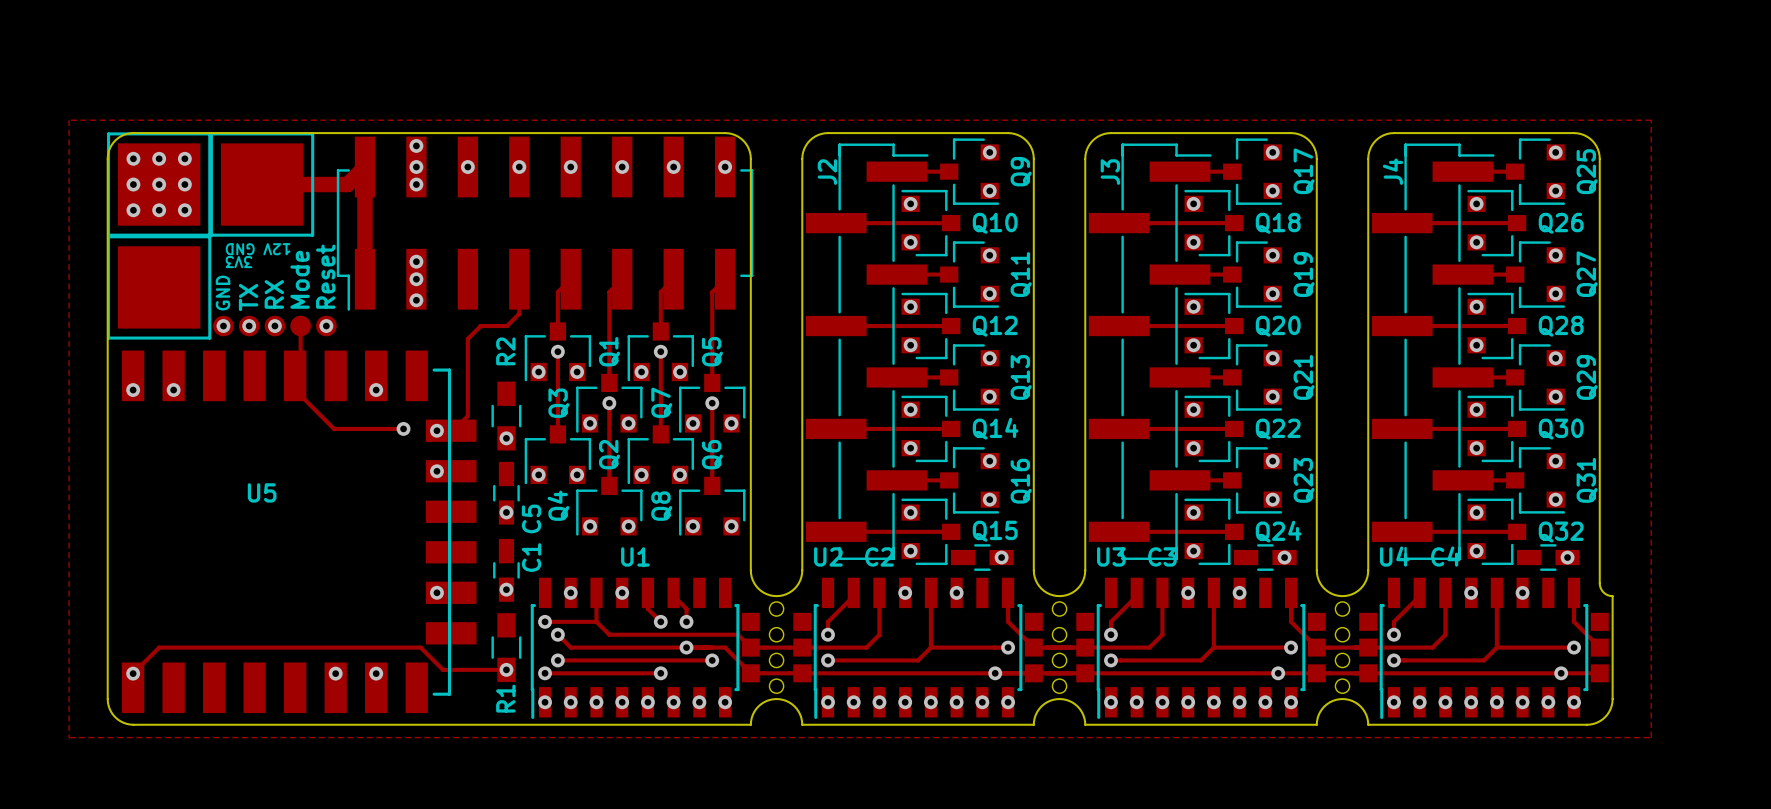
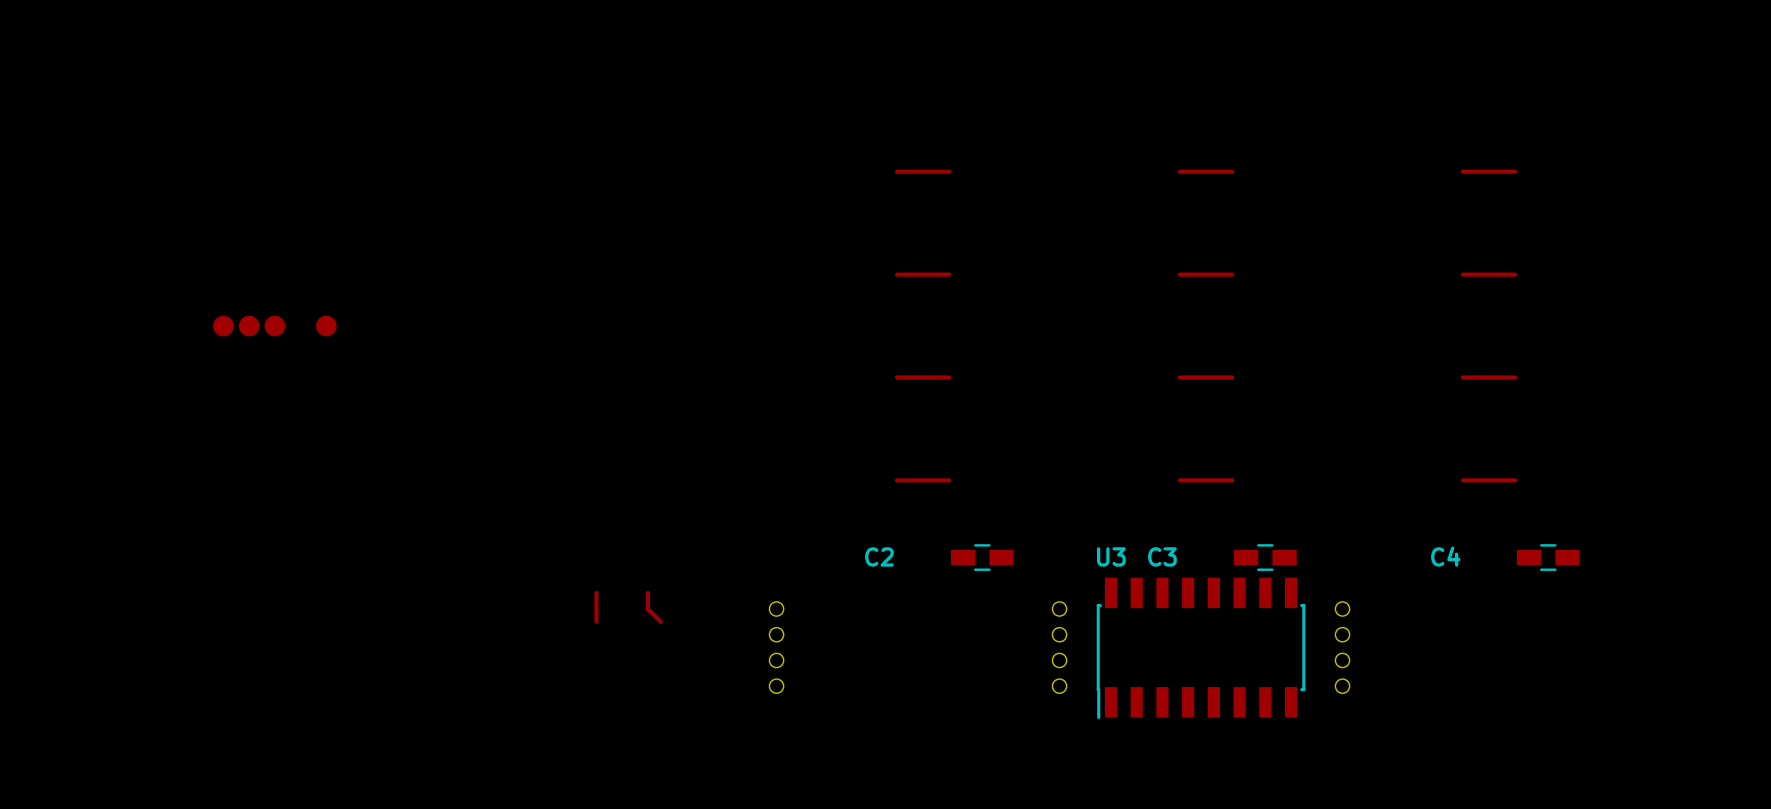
zone outline: (69, 120) (1651, 120) (1651, 737) (69, 737) (69, 120) -> none
board edge: (133, 133) (725, 133) (740, 138) (747, 145) (750, 158) (751, 573) (758, 588) (766, 594) (776, 596) (786, 594) (794, 588) (802, 573) (802, 158) (805, 145) (815, 136) (828, 133) (1008, 133) (1020, 136) (1030, 145) (1033, 158) (1033, 570) (1035, 580) (1041, 588) (1049, 594) (1059, 596) (1069, 594) (1077, 588) (1083, 580) (1085, 570) (1085, 158) (1088, 145) (1098, 136) (1110, 133) (1291, 133) (1306, 138) (1313, 145) (1316, 158) (1317, 573) (1324, 588) (1332, 594) (1342, 596) (1352, 594) (1360, 588) (1366, 580) (1368, 570) (1368, 158) (1371, 145) (1381, 136) (1393, 133) (1574, 133) (1583, 135) (1596, 145) (1599, 158) (1599, 583) (1603, 592) (1612, 596) (1612, 699) (1610, 708) (1599, 721) (1586, 724) (1368, 724) (1366, 714) (1360, 706) (1352, 700) (1342, 699) (1332, 700) (1324, 706) (1318, 714) (1316, 724) (1085, 724) (1083, 714) (1077, 706) (1069, 700) (1059, 699) (1049, 700) (1041, 706) (1035, 714) (1033, 724) (802, 724) (800, 714) (794, 706) (786, 700) (776, 699) (766, 700) (758, 706) (752, 714) (750, 724) (133, 724) (123, 722) (111, 711) (107, 699) (107, 158) (109, 148) (115, 140) (123, 135) (133, 133) -> none
via: (416, 145) -> none
via: (989, 152) -> none
via: (1272, 152) -> none
via: (1555, 152) -> none
via: (133, 158) -> none
via: (159, 158) -> none
via: (184, 158) -> none
via: (416, 167) -> none
via: (467, 167) -> none
via: (519, 167) -> none
via: (570, 167) -> none
via: (622, 167) -> none
via: (673, 167) -> none
via: (725, 167) -> none
Q9: (969, 171) -> none
Q17: (1252, 171) -> none
Q25: (1535, 171) -> none
via: (133, 184) -> none
part: (159, 184) -> none
via: (159, 184) -> none
via: (184, 184) -> none
track: (262, 184) (347, 184) (364, 167) (364, 279) -> none
part: (262, 184) -> none
via: (416, 184) -> none
via: (989, 190) -> none
via: (1272, 190) -> none
via: (1555, 190) -> none
via: (910, 203) -> none
via: (1193, 203) -> none
via: (1476, 203) -> none
via: (133, 210) -> none
via: (159, 210) -> none
via: (184, 210) -> none
part: (545, 223) -> none
track: (836, 223) (951, 223) -> none
Q10: (930, 223) -> none
track: (1119, 223) (1234, 223) -> none
Q18: (1213, 223) -> none
track: (1402, 223) (1517, 223) -> none
Q26: (1496, 223) -> none
via: (910, 242) -> none
via: (1193, 242) -> none
via: (1476, 242) -> none
text: GND (240, 249) -> none
text: 12V (276, 249) -> none
via: (989, 255) -> none
via: (1272, 255) -> none
via: (1555, 255) -> none
via: (416, 261) -> none
text: 3V3 (239, 262) -> none
Q11: (969, 274) -> none
Q19: (1252, 274) -> none
Q27: (1535, 274) -> none
text: Reset (325, 276) -> none
text: Mode (300, 279) -> none
via: (416, 279) -> none
track: (519, 279) (519, 313) (507, 326) (480, 326) (467, 338) (467, 416) (453, 430) (436, 430) -> none
track: (570, 279) (557, 292) (557, 331) -> none
track: (622, 279) (609, 292) (609, 382) -> none
track: (673, 279) (660, 292) (660, 331) -> none
track: (725, 279) (712, 292) (712, 382) -> none
part: (159, 287) -> none
text: GND (223, 293) -> none
via: (989, 293) -> none
via: (1272, 293) -> none
via: (1555, 293) -> none
text: RX (274, 294) -> none
text: TX (248, 297) -> none
via: (416, 300) -> none
via: (910, 306) -> none
via: (1193, 306) -> none
via: (1476, 306) -> none
via: (223, 326) -> none
via: (249, 326) -> none
via: (274, 326) -> none
track: (300, 326) (300, 384) (295, 390) (334, 428) (403, 428) -> none
part: (300, 326) -> none
via: (326, 326) -> none
track: (836, 326) (951, 326) -> none
Q12: (930, 326) -> none
track: (1119, 326) (1234, 326) -> none
Q20: (1213, 326) -> none
track: (1402, 326) (1517, 326) -> none
Q28: (1496, 326) -> none
via: (910, 345) -> none
via: (1193, 345) -> none
via: (1476, 345) -> none
track: (557, 351) (557, 434) -> none
Q1: (557, 351) -> none
via: (557, 351) -> none
track: (660, 351) (660, 434) -> none
Q5: (660, 351) -> none
via: (660, 351) -> none
J2: (867, 351) -> none
J3: (1150, 351) -> none
J4: (1433, 351) -> none
via: (989, 358) -> none
via: (1272, 358) -> none
via: (1555, 358) -> none
via: (538, 372) -> none
via: (577, 372) -> none
via: (641, 372) -> none
via: (680, 372) -> none
Q13: (969, 377) -> none
Q21: (1252, 377) -> none
Q29: (1535, 377) -> none
via: (133, 390) -> none
via: (173, 390) -> none
via: (376, 390) -> none
via: (989, 396) -> none
via: (1272, 396) -> none
via: (1555, 396) -> none
track: (609, 403) (609, 485) -> none
Q3: (609, 403) -> none
via: (609, 403) -> none
track: (712, 403) (712, 485) -> none
Q7: (712, 403) -> none
via: (712, 403) -> none
via: (910, 409) -> none
via: (1193, 409) -> none
via: (1476, 409) -> none
R2: (506, 416) -> none
via: (590, 423) -> none
via: (628, 423) -> none
via: (693, 423) -> none
via: (731, 423) -> none
via: (403, 428) -> none
track: (836, 428) (951, 428) -> none
Q14: (930, 428) -> none
track: (1119, 428) (1234, 428) -> none
Q22: (1213, 428) -> none
track: (1402, 428) (1517, 428) -> none
Q30: (1496, 428) -> none
via: (436, 430) -> none
via: (506, 438) -> none
via: (910, 448) -> none
via: (1193, 448) -> none
via: (1476, 448) -> none
Q2: (557, 454) -> none
Q6: (660, 454) -> none
via: (989, 461) -> none
via: (1272, 461) -> none
via: (1555, 461) -> none
via: (436, 471) -> none
via: (538, 474) -> none
via: (577, 474) -> none
via: (641, 474) -> none
via: (680, 474) -> none
Q15: (969, 480) -> none
Q23: (1252, 480) -> none
Q31: (1535, 480) -> none
C5: (506, 493) -> none
via: (989, 499) -> none
via: (1272, 499) -> none
via: (1555, 499) -> none
Q4: (609, 506) -> none
Q8: (712, 506) -> none
via: (506, 512) -> none
via: (910, 512) -> none
via: (1193, 512) -> none
via: (1476, 512) -> none
via: (590, 526) -> none
via: (628, 526) -> none
via: (693, 526) -> none
via: (731, 526) -> none
U5: (299, 531) -> none
track: (836, 531) (951, 531) -> none
Q16: (930, 531) -> none
track: (1119, 531) (1234, 531) -> none
Q24: (1213, 531) -> none
track: (1402, 531) (1517, 531) -> none
Q32: (1496, 531) -> none
via: (910, 551) -> none
via: (1193, 551) -> none
via: (1476, 551) -> none
via: (1001, 557) -> none
via: (1284, 557) -> none
via: (1567, 557) -> none
C1: (506, 570) -> none
via: (506, 589) -> none
via: (436, 592) -> none
via: (570, 592) -> none
via: (622, 592) -> none
track: (673, 592) (673, 596) (686, 608) (686, 621) -> none
track: (853, 592) (853, 596) (828, 621) (828, 634) -> none
track: (879, 592) (879, 634) (866, 647) (750, 647) (737, 634) (609, 634) (596, 621) (545, 621) -> none
via: (905, 592) -> none
track: (930, 592) (930, 647) -> none
via: (956, 592) -> none
track: (1008, 592) (1008, 621) (1033, 647) (1149, 647) (1162, 634) (1162, 592) -> none
track: (1136, 592) (1136, 596) (1110, 621) (1110, 634) -> none
via: (1188, 592) -> none
track: (1213, 592) (1213, 647) -> none
via: (1239, 592) -> none
track: (1291, 592) (1291, 621) (1316, 647) (1432, 647) (1445, 634) (1445, 592) -> none
track: (1419, 592) (1419, 596) (1393, 621) (1393, 634) -> none
via: (1471, 592) -> none
track: (1496, 592) (1496, 647) -> none
via: (1522, 592) -> none
track: (1574, 592) (1574, 621) (1599, 647) -> none
via: (545, 621) -> none
via: (660, 621) -> none
via: (686, 621) -> none
part: (750, 621) -> none
part: (802, 621) -> none
part: (1033, 621) -> none
part: (1085, 621) -> none
part: (1316, 621) -> none
part: (1368, 621) -> none
part: (1599, 621) -> none
track: (557, 634) (570, 647) (725, 647) (750, 673) (1599, 673) -> none
via: (557, 634) -> none
via: (828, 634) -> none
via: (1110, 634) -> none
via: (1393, 634) -> none
R1: (506, 647) -> none
via: (686, 647) -> none
part: (750, 647) -> none
part: (802, 647) -> none
track: (930, 647) (1008, 647) -> none
track: (930, 647) (918, 660) (828, 660) -> none
via: (1008, 647) -> none
part: (1033, 647) -> none
part: (1085, 647) -> none
track: (1213, 647) (1291, 647) -> none
track: (1213, 647) (1201, 660) (1110, 660) -> none
via: (1291, 647) -> none
part: (1316, 647) -> none
part: (1368, 647) -> none
track: (1496, 647) (1574, 647) -> none
track: (1496, 647) (1483, 660) (1393, 660) -> none
via: (1574, 647) -> none
part: (1599, 647) -> none
U1: (635, 648) -> none
U2: (918, 648) -> none
U4: (1483, 648) -> none
track: (557, 660) (712, 660) -> none
via: (557, 660) -> none
via: (712, 660) -> none
via: (828, 660) -> none
via: (1110, 660) -> none
via: (1393, 660) -> none
track: (506, 669) (442, 669) (420, 647) (159, 647) (133, 673) -> none
via: (506, 669) -> none
via: (133, 673) -> none
via: (335, 673) -> none
via: (376, 673) -> none
track: (545, 673) (660, 673) -> none
via: (545, 673) -> none
via: (660, 673) -> none
part: (750, 673) -> none
part: (802, 673) -> none
via: (995, 673) -> none
part: (1033, 673) -> none
part: (1085, 673) -> none
via: (1278, 673) -> none
part: (1316, 673) -> none
part: (1368, 673) -> none
via: (1561, 673) -> none
part: (1599, 673) -> none
via: (545, 702) -> none
via: (570, 702) -> none
via: (596, 702) -> none
via: (622, 702) -> none
via: (647, 702) -> none
via: (673, 702) -> none
via: (699, 702) -> none
via: (725, 702) -> none
via: (828, 702) -> none
via: (853, 702) -> none
via: (879, 702) -> none
via: (905, 702) -> none
via: (930, 702) -> none
via: (956, 702) -> none
via: (982, 702) -> none
via: (1008, 702) -> none
via: (1110, 702) -> none
via: (1136, 702) -> none
via: (1162, 702) -> none
via: (1188, 702) -> none
via: (1213, 702) -> none
via: (1239, 702) -> none
via: (1265, 702) -> none
via: (1291, 702) -> none
via: (1393, 702) -> none
via: (1419, 702) -> none
via: (1445, 702) -> none
via: (1471, 702) -> none
via: (1496, 702) -> none
via: (1522, 702) -> none
via: (1548, 702) -> none
via: (1574, 702) -> none

